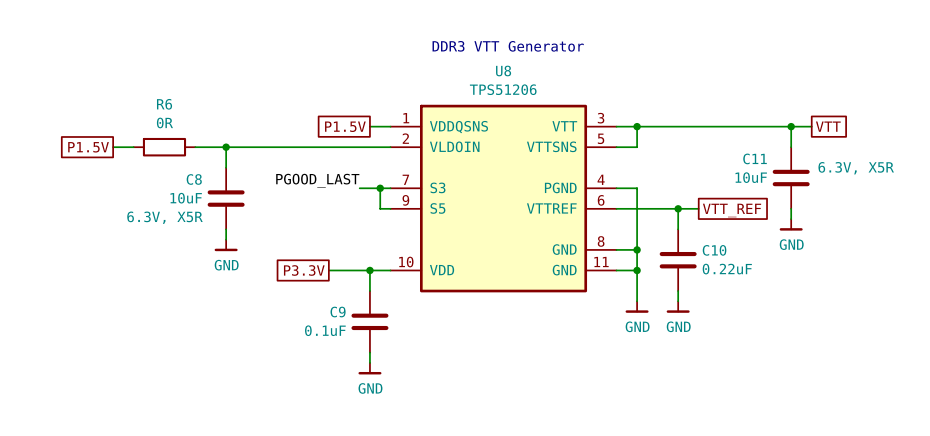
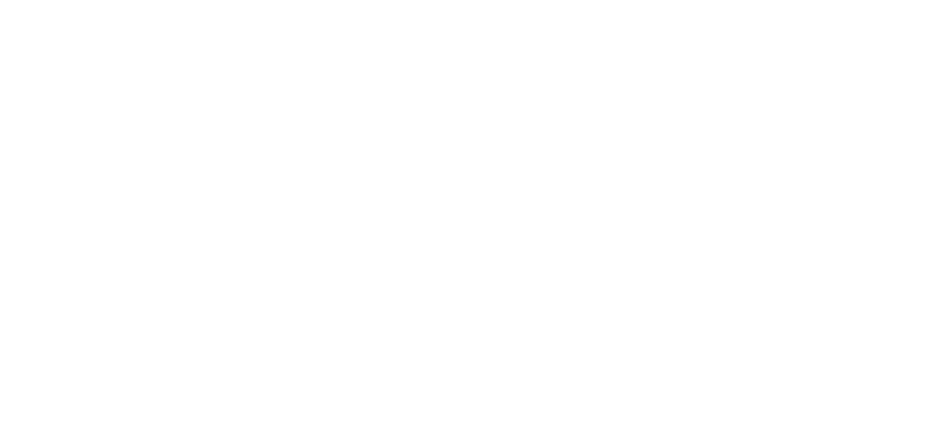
text: DDR3 VTT Generator (508, 46) -> none
global label: P1.5V (345, 126) -> none
wire: (369, 126) (390, 126) -> none
wire: (616, 126) (811, 126) -> none
wire: (637, 126) (637, 147) (616, 147) -> none
junction: (637, 126) -> none
wire: (791, 126) (791, 147) -> none
junction: (791, 126) -> none
global label: VTT (828, 126) -> none
global label: P1.5V (88, 147) -> none
wire: (113, 147) (133, 147) -> none
R6: 0R (164, 147) -> none
wire: (195, 147) (390, 147) -> none
wire: (226, 147) (226, 167) -> none
junction: (226, 147) -> none
C11: 10uF (791, 178) -> none
label: PGOOD_LAST (317, 180) -> none
wire: (359, 188) (390, 188) -> none
wire: (380, 188) (380, 208) (390, 208) -> none
junction: (380, 188) -> none
wire: (616, 188) (637, 188) (637, 301) -> none
C8: 10uF (226, 198) -> none
U8: TPS51206 (503, 198) -> none
wire: (616, 208) (698, 208) -> none
wire: (678, 208) (678, 229) -> none
junction: (678, 208) -> none
wire: (791, 208) (791, 219) -> none
global label: VTT_REF (732, 210) -> none
power symbol: GND (791, 224) -> none
wire: (226, 229) (226, 239) -> none
power symbol: GND (226, 245) -> none
wire: (616, 249) (637, 249) -> none
junction: (637, 249) -> none
C10: 0.22uF (678, 260) -> none
global label: P3.3V (304, 270) -> none
wire: (328, 270) (390, 270) -> none
wire: (369, 270) (369, 291) -> none
junction: (369, 270) -> none
wire: (616, 270) (637, 270) -> none
junction: (637, 270) -> none
wire: (678, 291) (678, 301) -> none
power symbol: GND (637, 307) -> none
power symbol: GND (678, 307) -> none
C9: 0.1uF (369, 321) -> none
wire: (369, 352) (369, 362) -> none
power symbol: GND (369, 368) -> none

